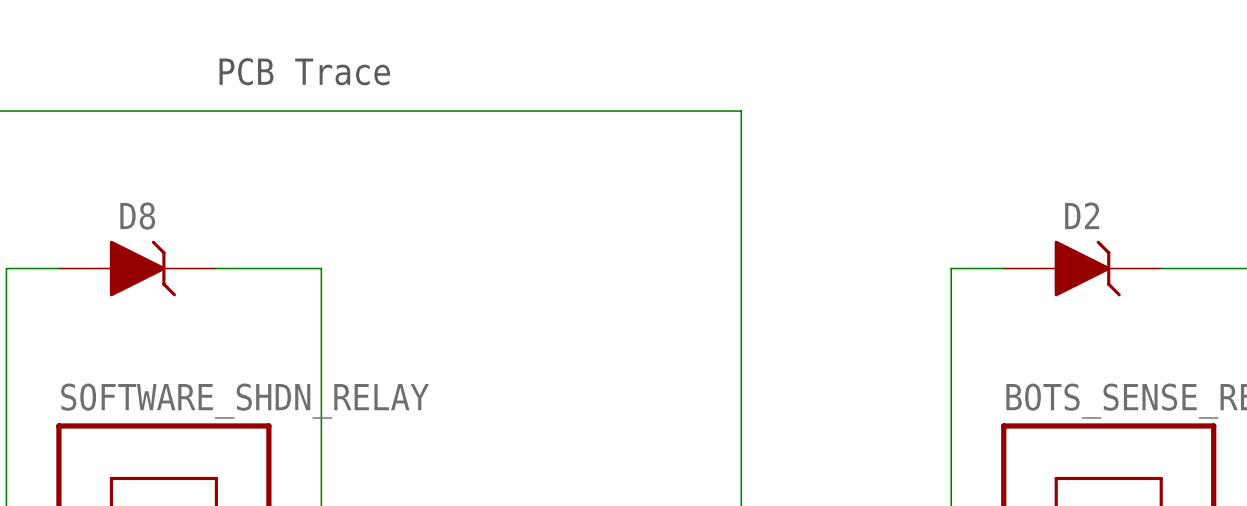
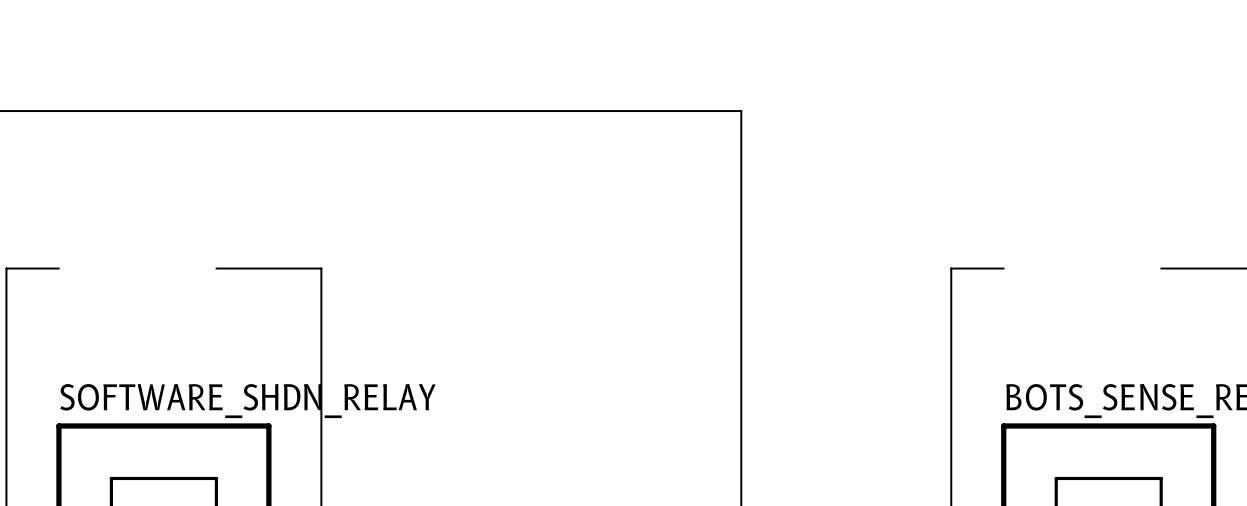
text: PCB Trace (304, 71) -> none
D8: (137, 268) -> none
D2: (1082, 268) -> none

